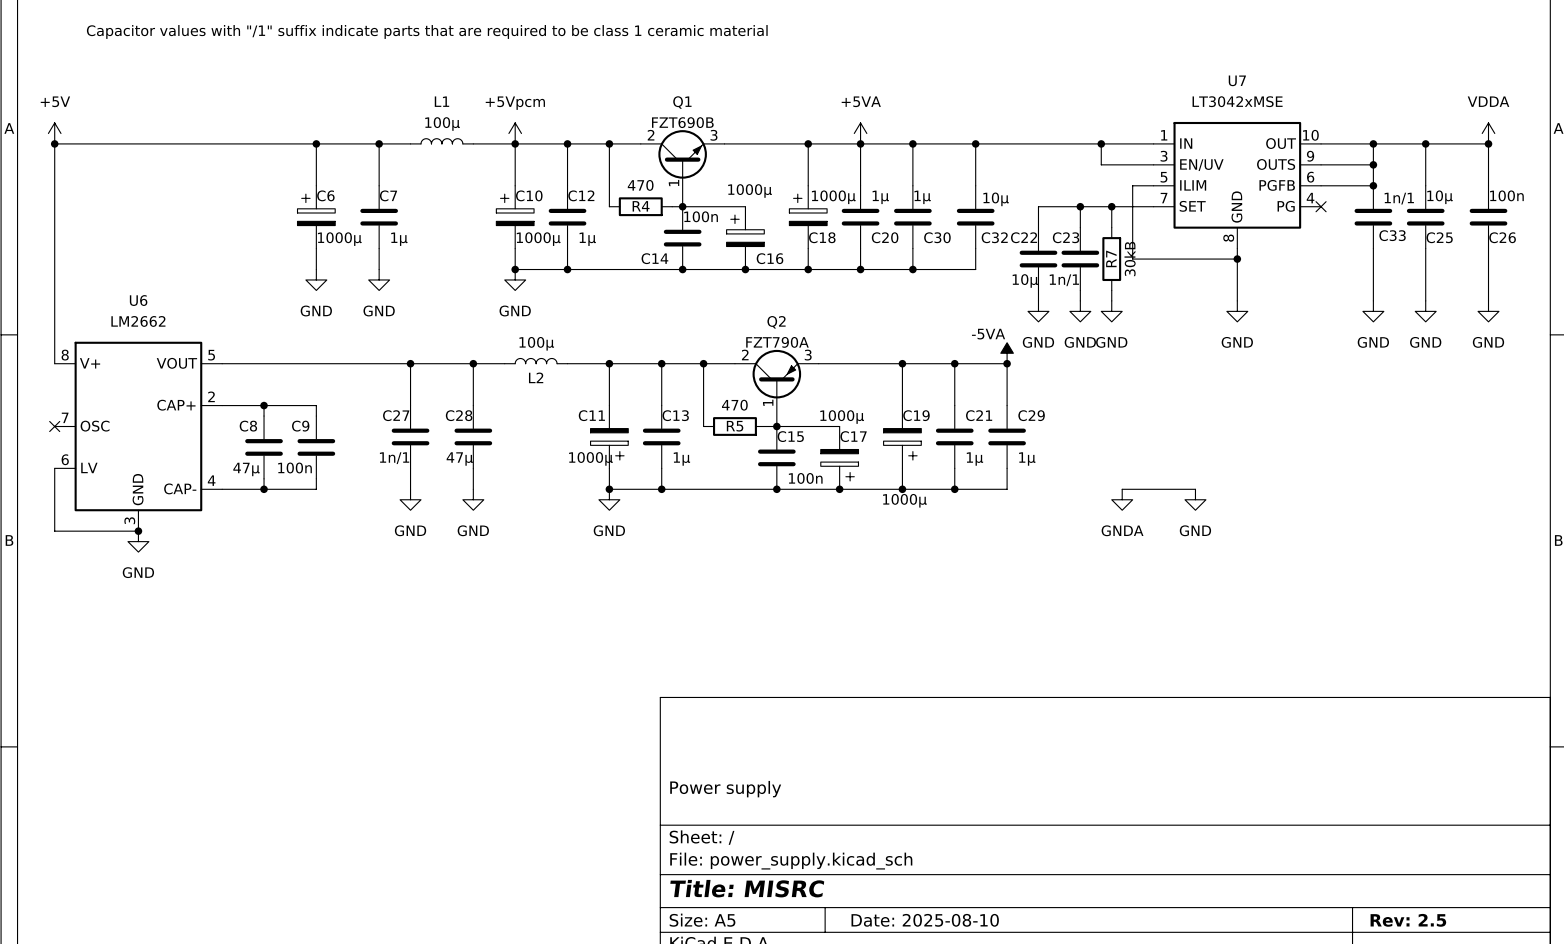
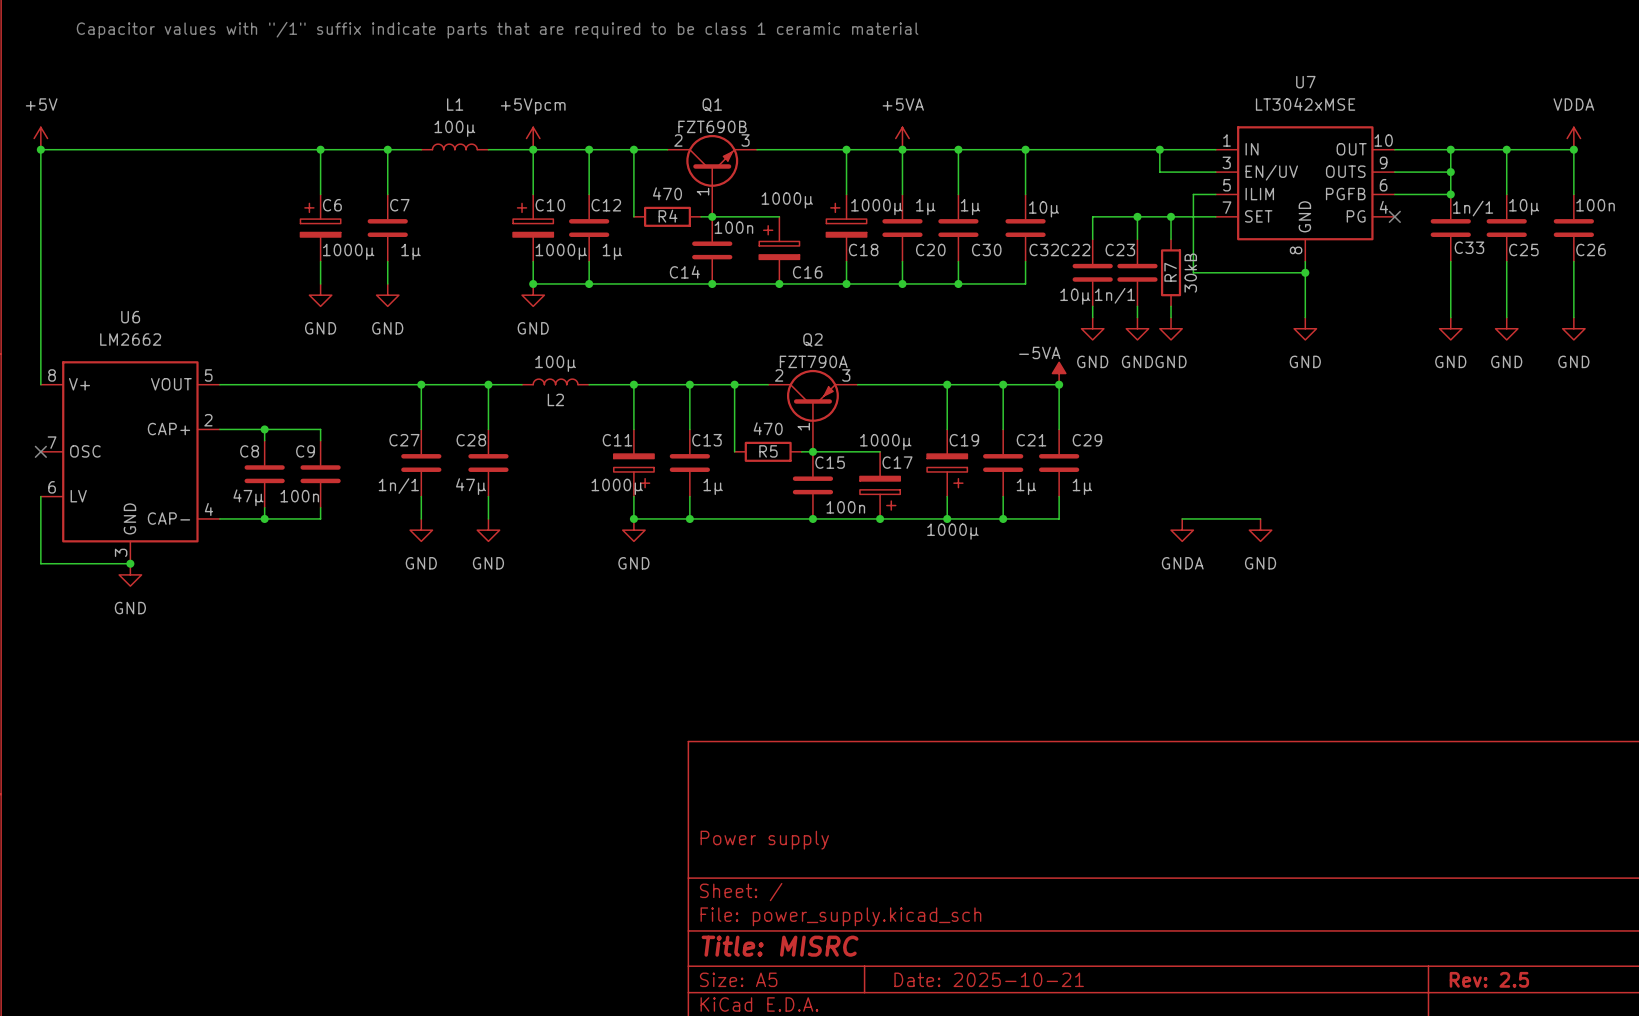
title block: Date: 2025-08-10 (925, 920) -> Date: 2025-10-21 (989, 979)

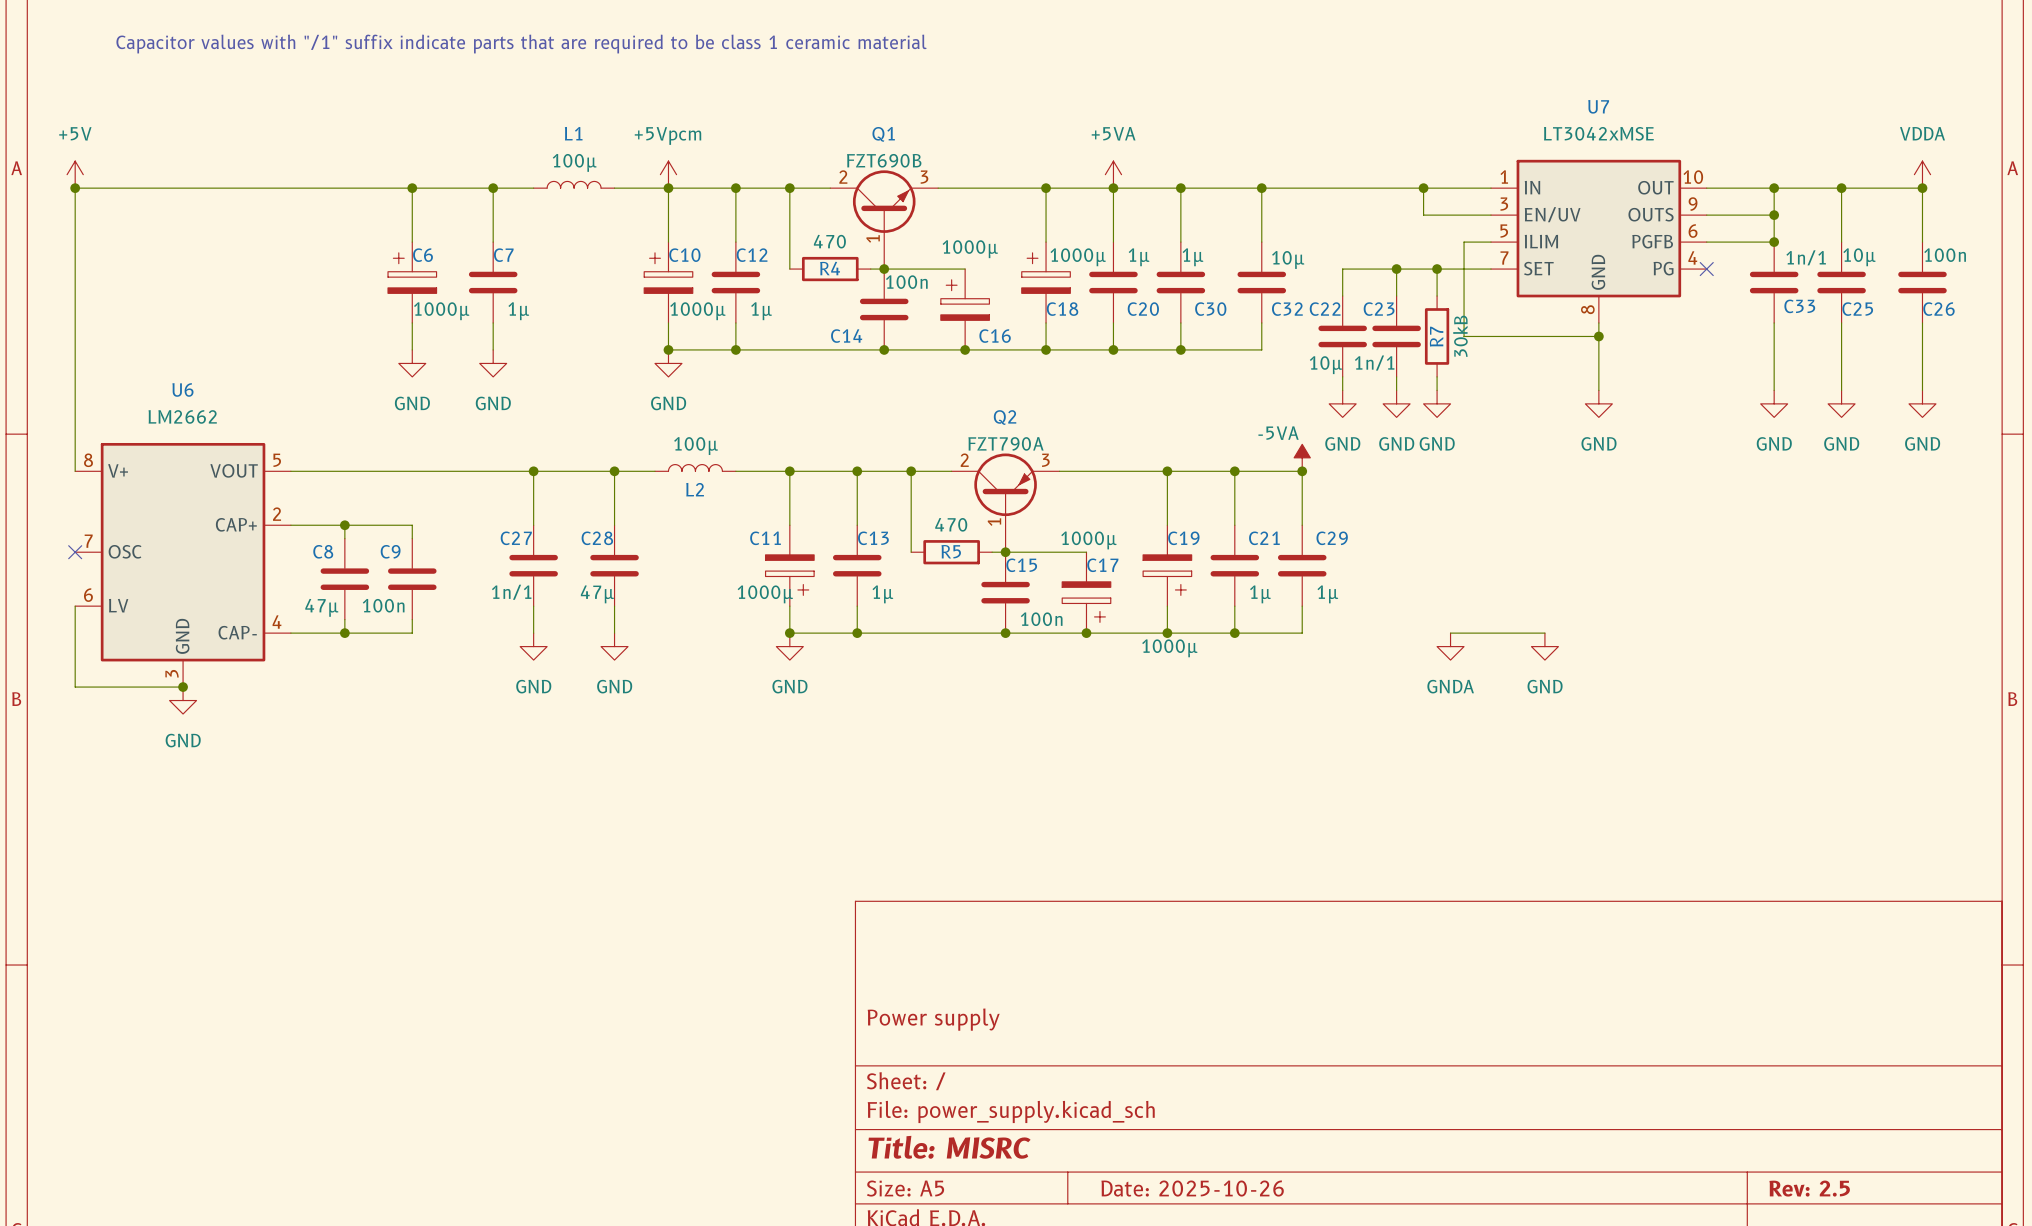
title block: Date: 2025-10-21 (989, 979) -> Date: 2025-10-26 (1192, 1188)

